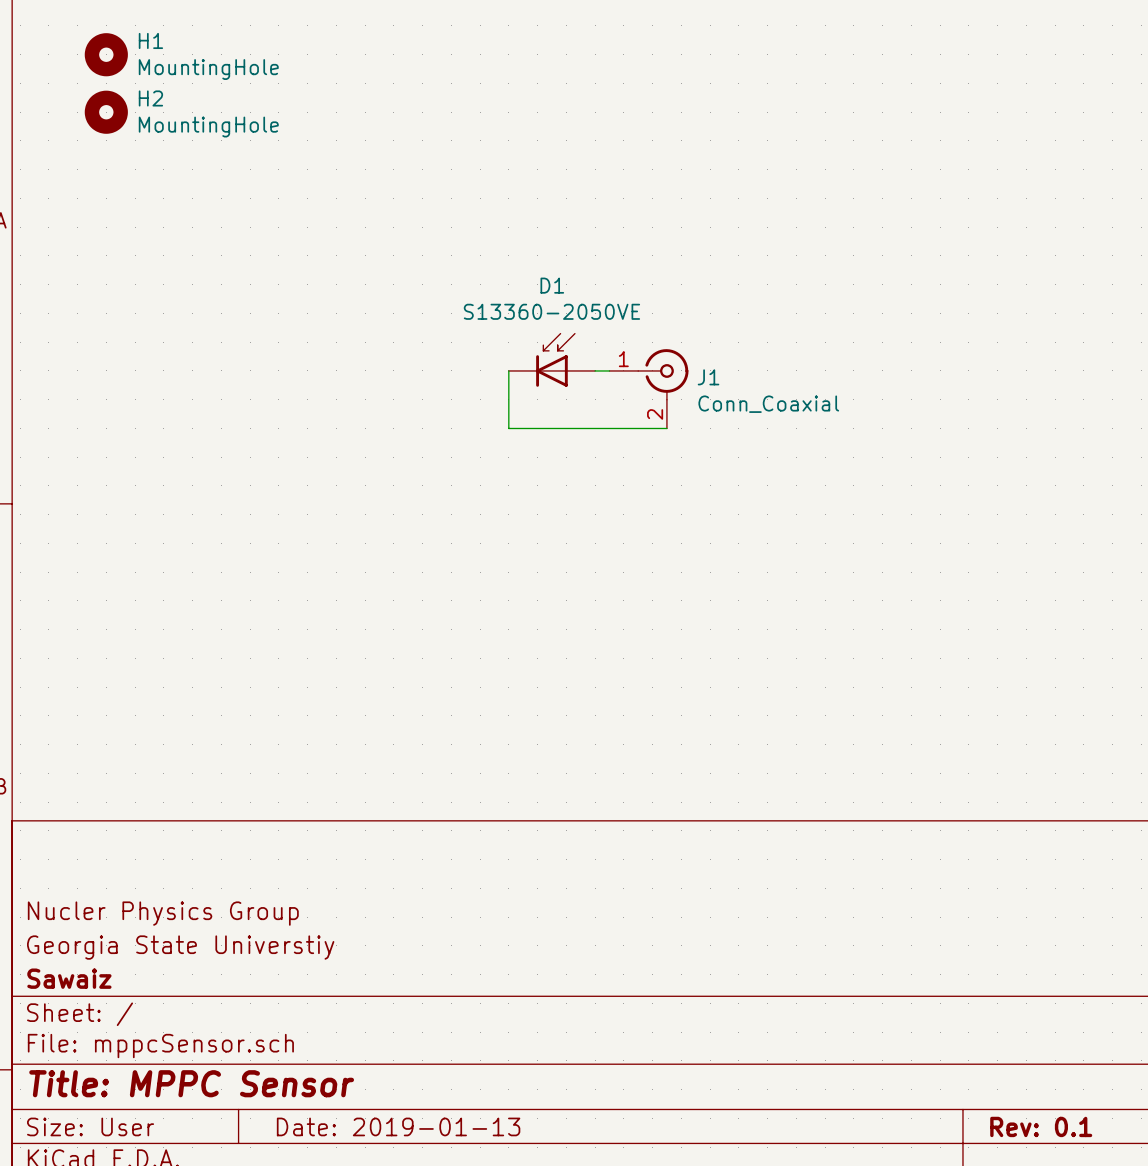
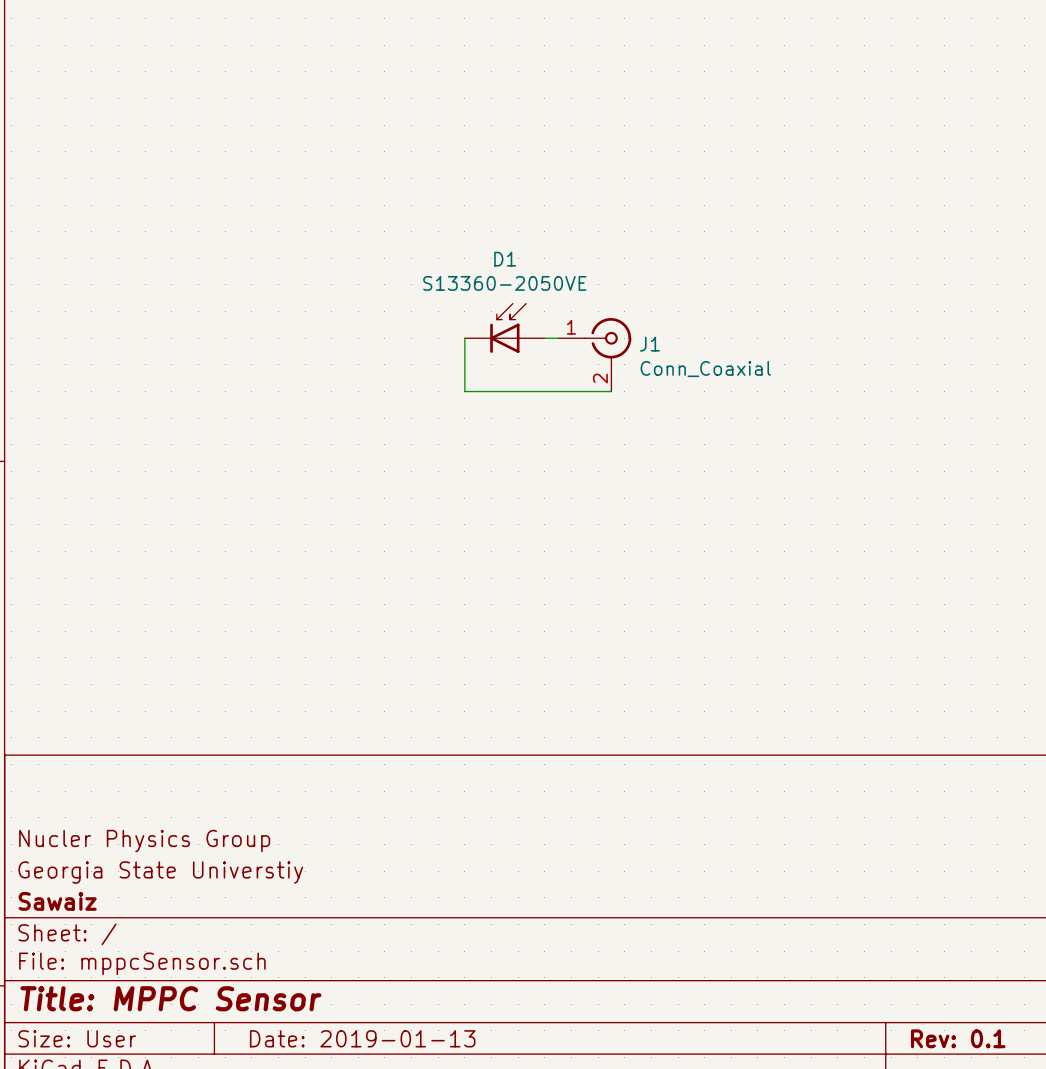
H1: MountingHole (106, 54) -> none
H2: MountingHole (106, 112) -> none

